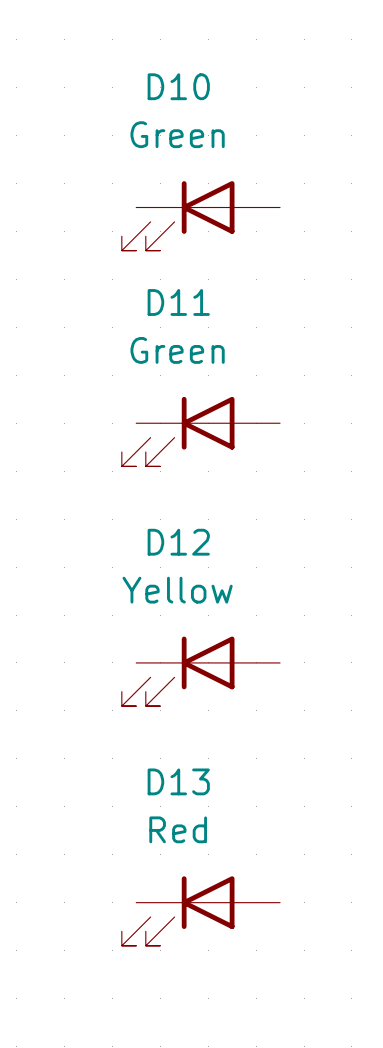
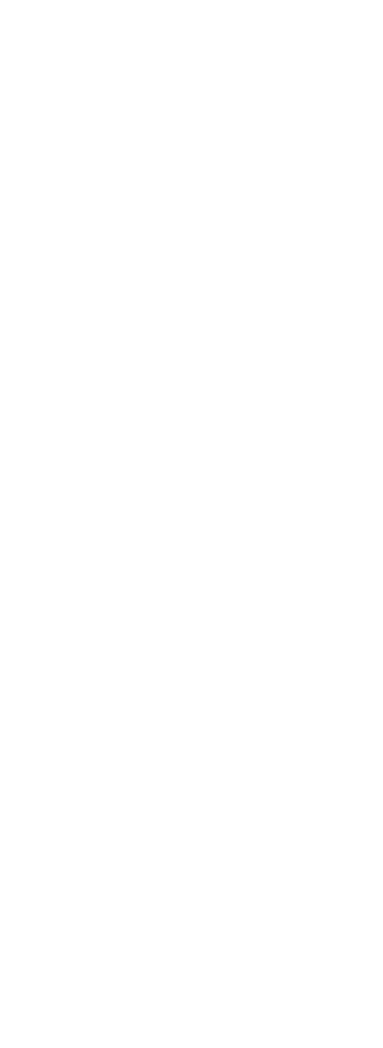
D10: Green (200, 215) -> none
D11: Green (200, 431) -> none
D12: Yellow (200, 671) -> none
D13: Red (200, 911) -> none

